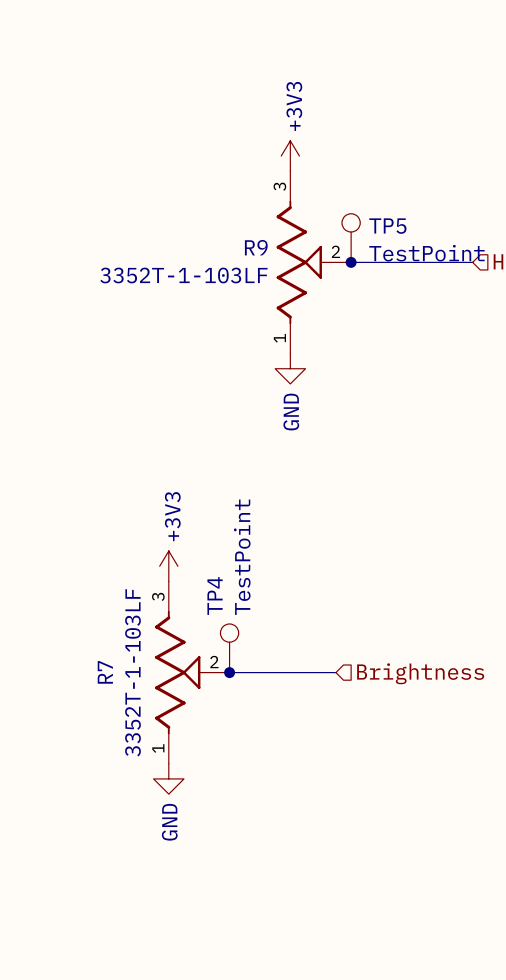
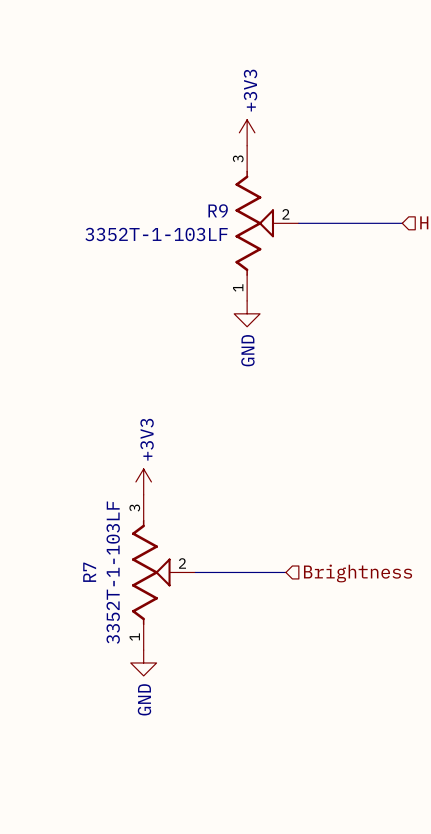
TP5: TestPoint (351, 238) -> none
junction: (351, 262) -> none
TP4: TestPoint (229, 648) -> none
junction: (229, 672) -> none

